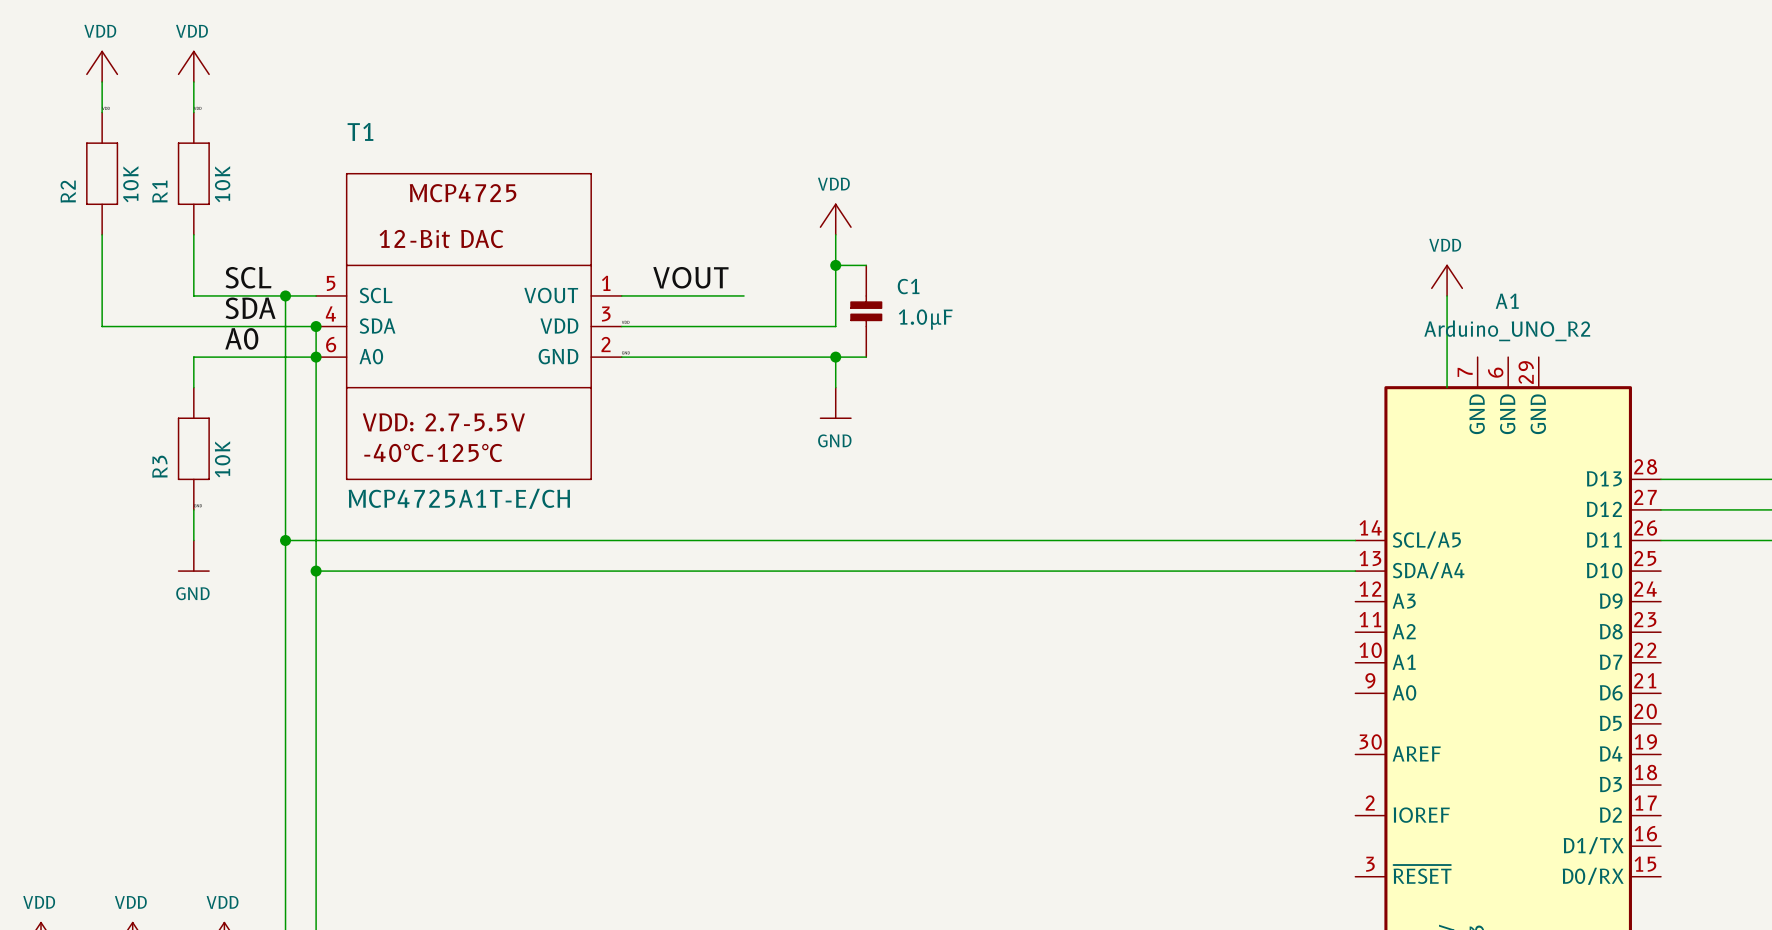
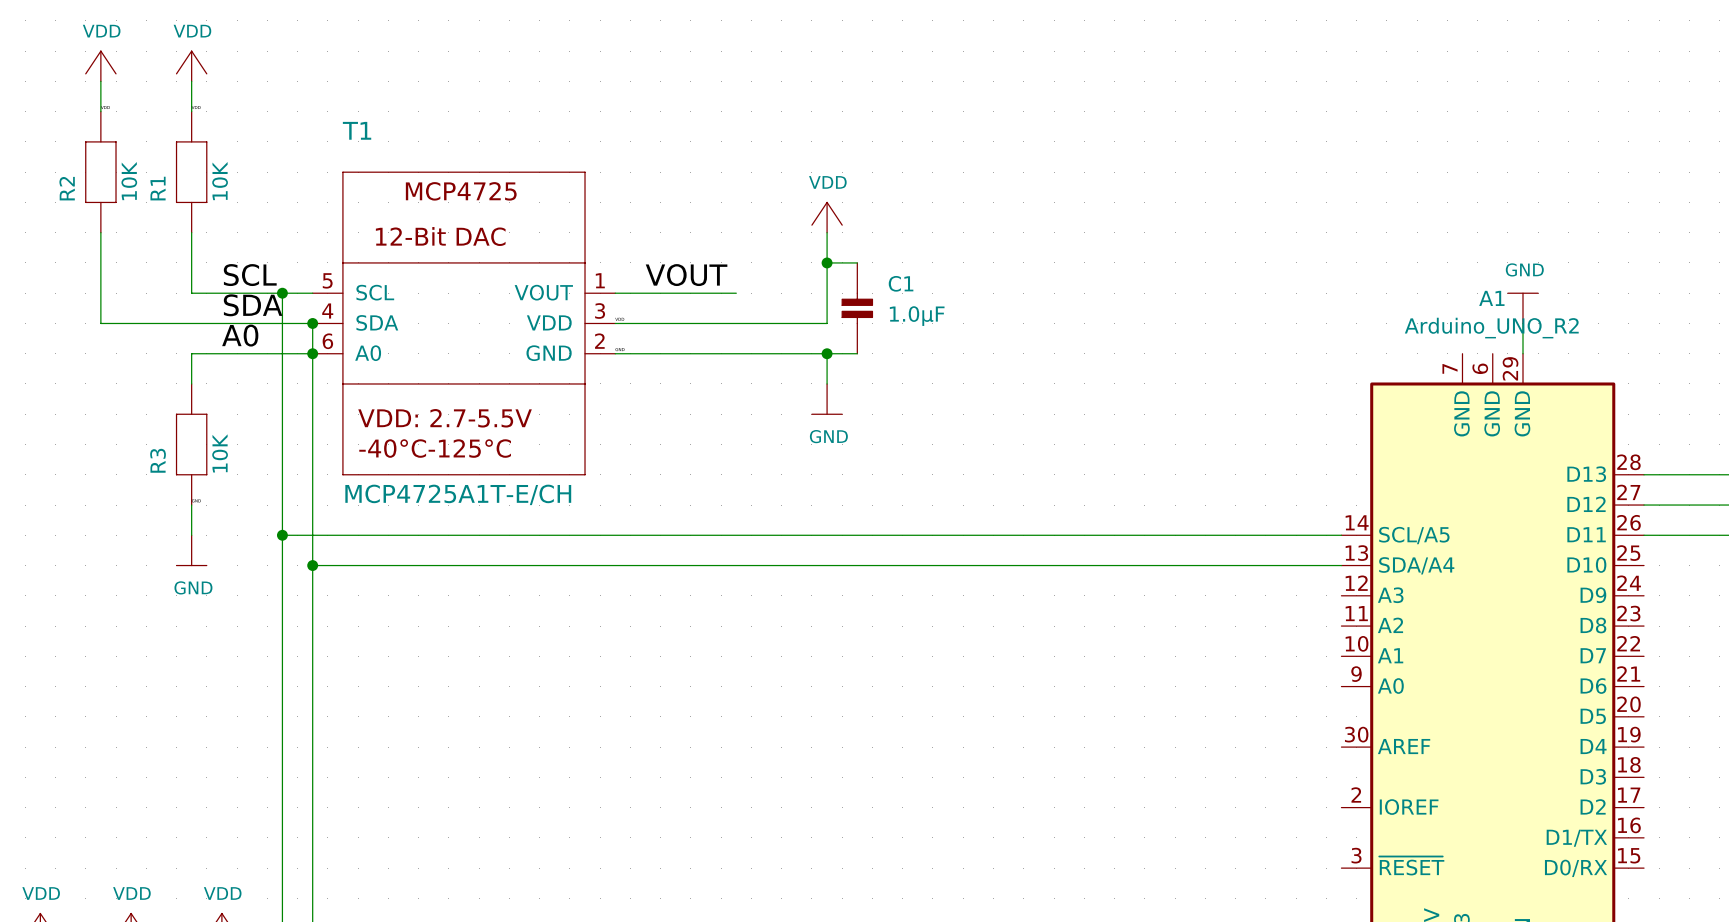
power symbol: VDD (1447, 280) -> none
wire: (1447, 295) (1447, 387) -> none
power symbol: none -> GND (1522, 308)
wire: none -> (1522, 323) (1522, 353)

